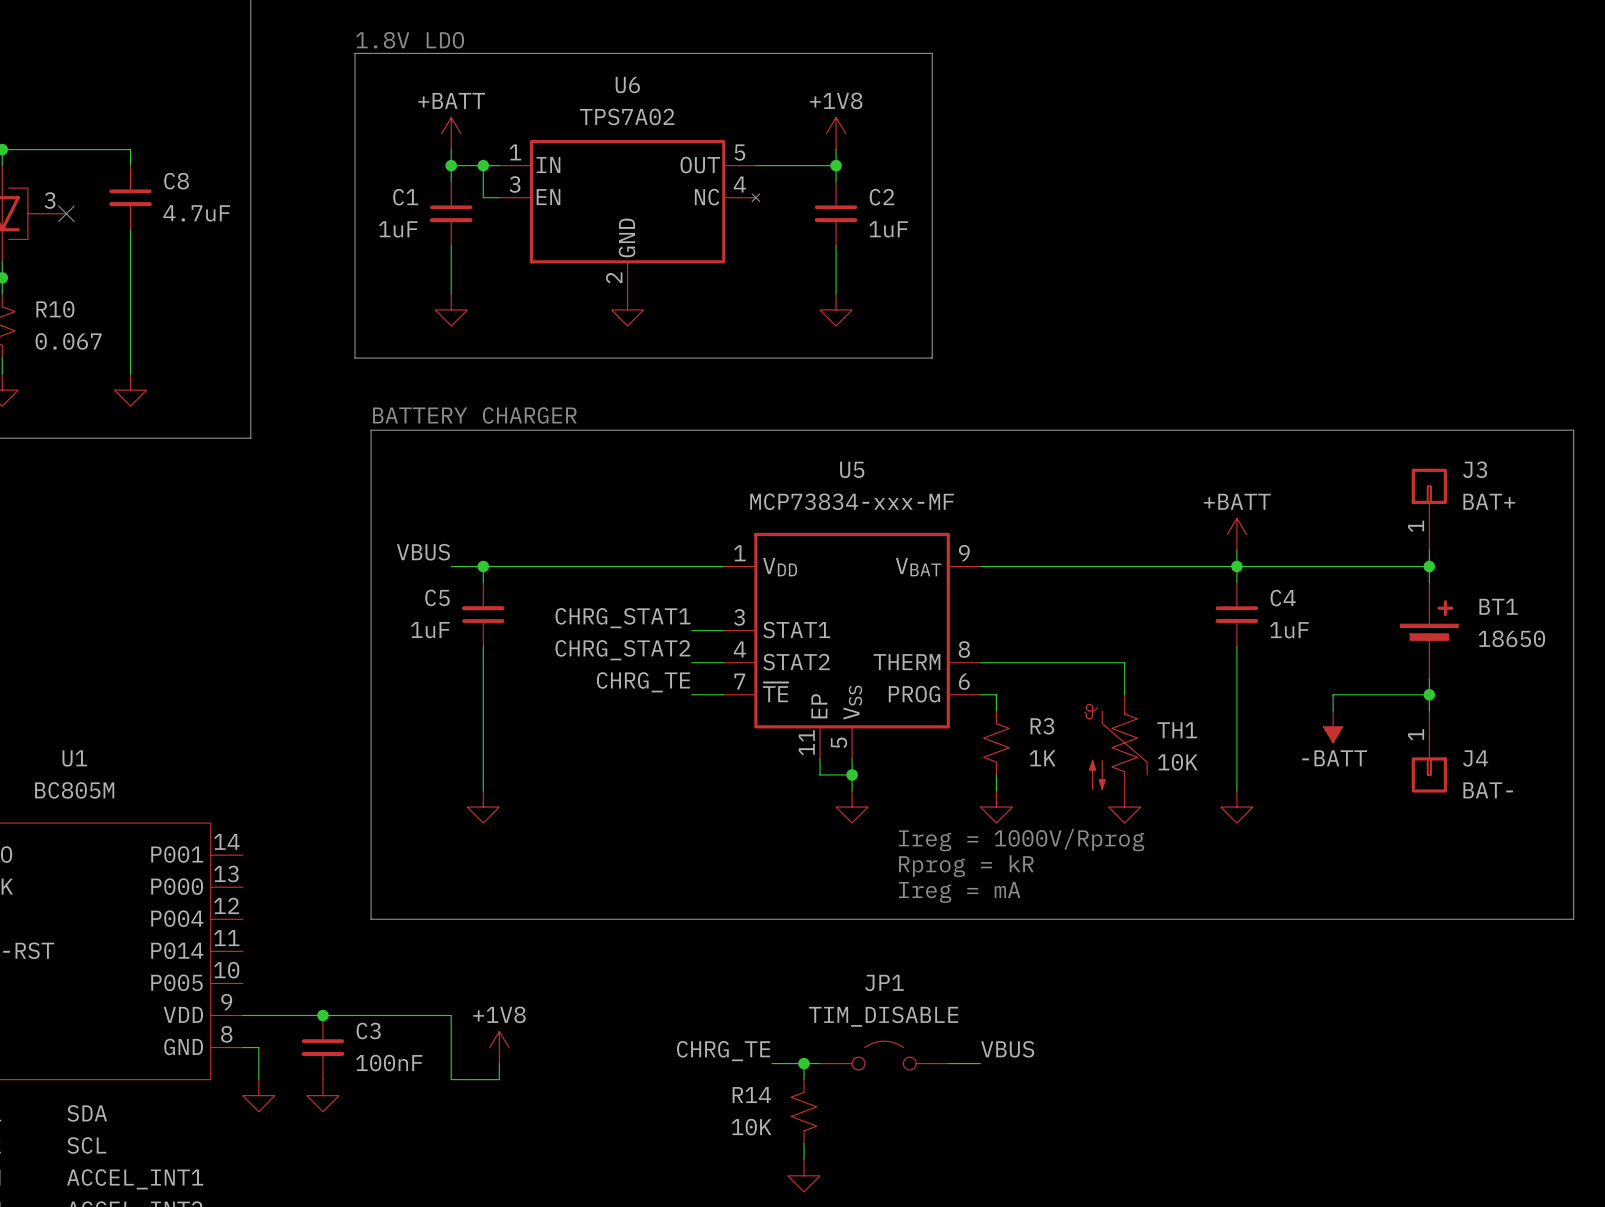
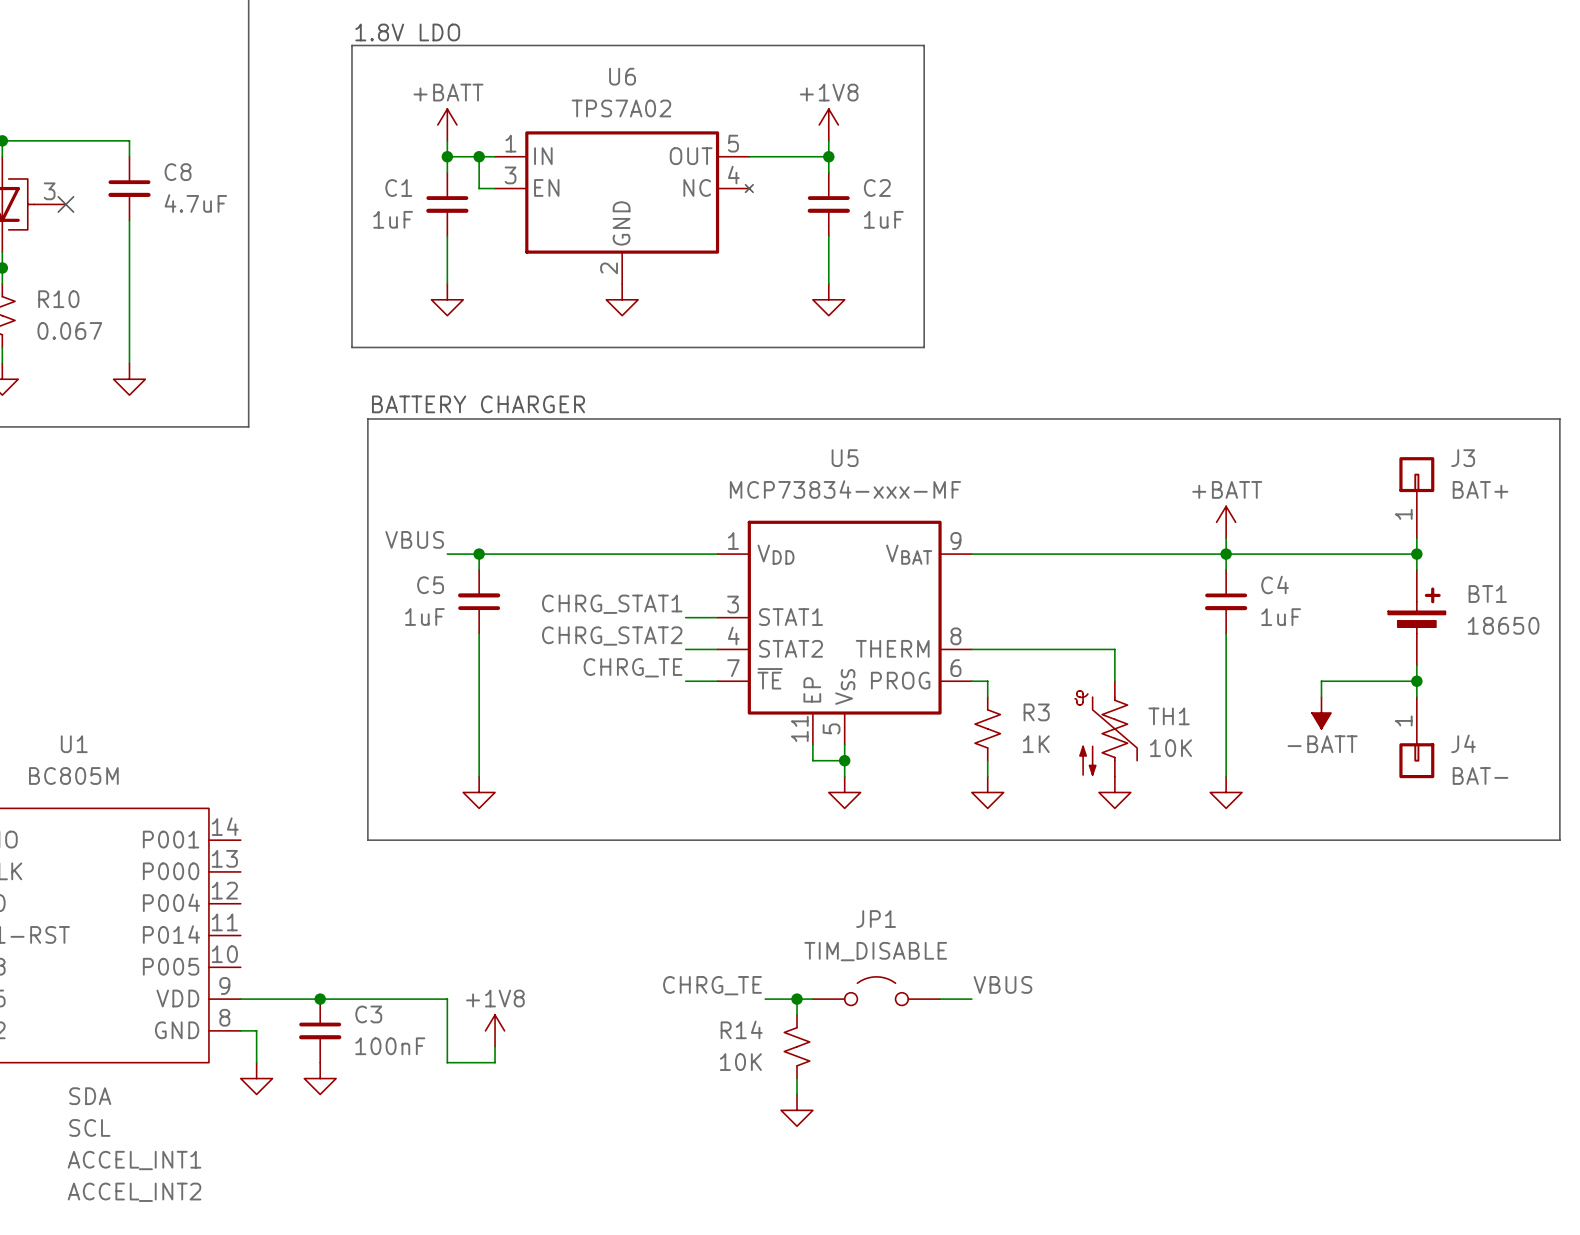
text: Ireg = 1000V/Rprog (1021, 840) -> none
line: (371, 855) (371, 919) (1573, 919) (1573, 855) -> (367, 840) (1559, 840)
text: Rprog = kR (966, 866) -> none
text: Ireg = mA (959, 892) -> none
label position: VBUS (1007, 1049) -> VBUS (1002, 984)
label position: CHRG_TE (723, 1051) -> CHRG_TE (712, 985)
JP1 position: (884, 1055) -> (876, 991)
wire: (771, 1063) (820, 1063) -> (765, 999) (812, 999)
wire: (803, 1063) (803, 1079) -> (797, 999) (797, 1014)
junction position: (803, 1063) -> (797, 999)
wire: (948, 1063) (980, 1063) -> (940, 999) (971, 999)
R14 position: (803, 1111) -> (797, 1046)
wire: (803, 1143) (803, 1159) -> (797, 1078) (797, 1094)
power symbol position: (803, 1175) -> (797, 1110)

